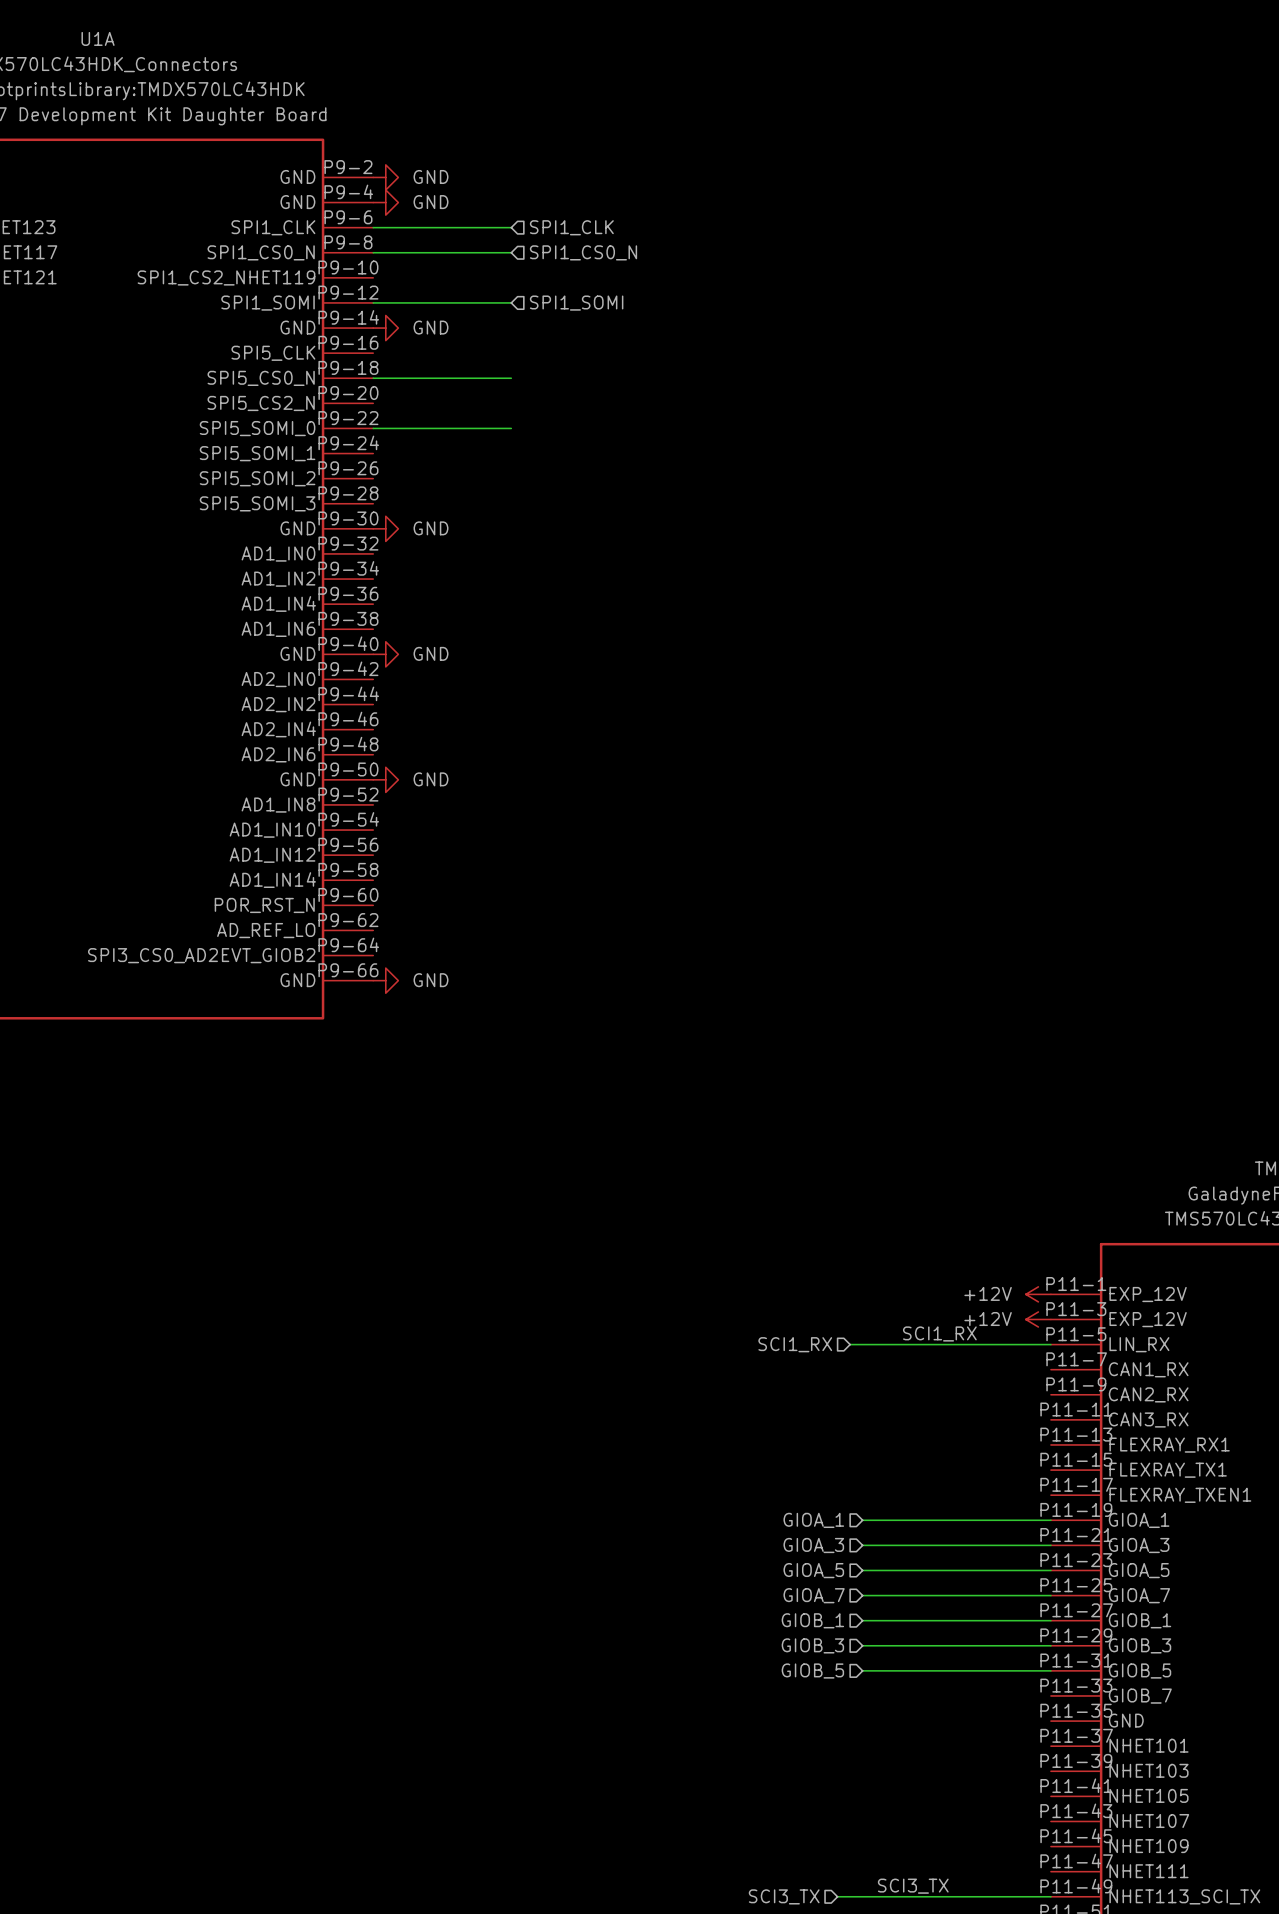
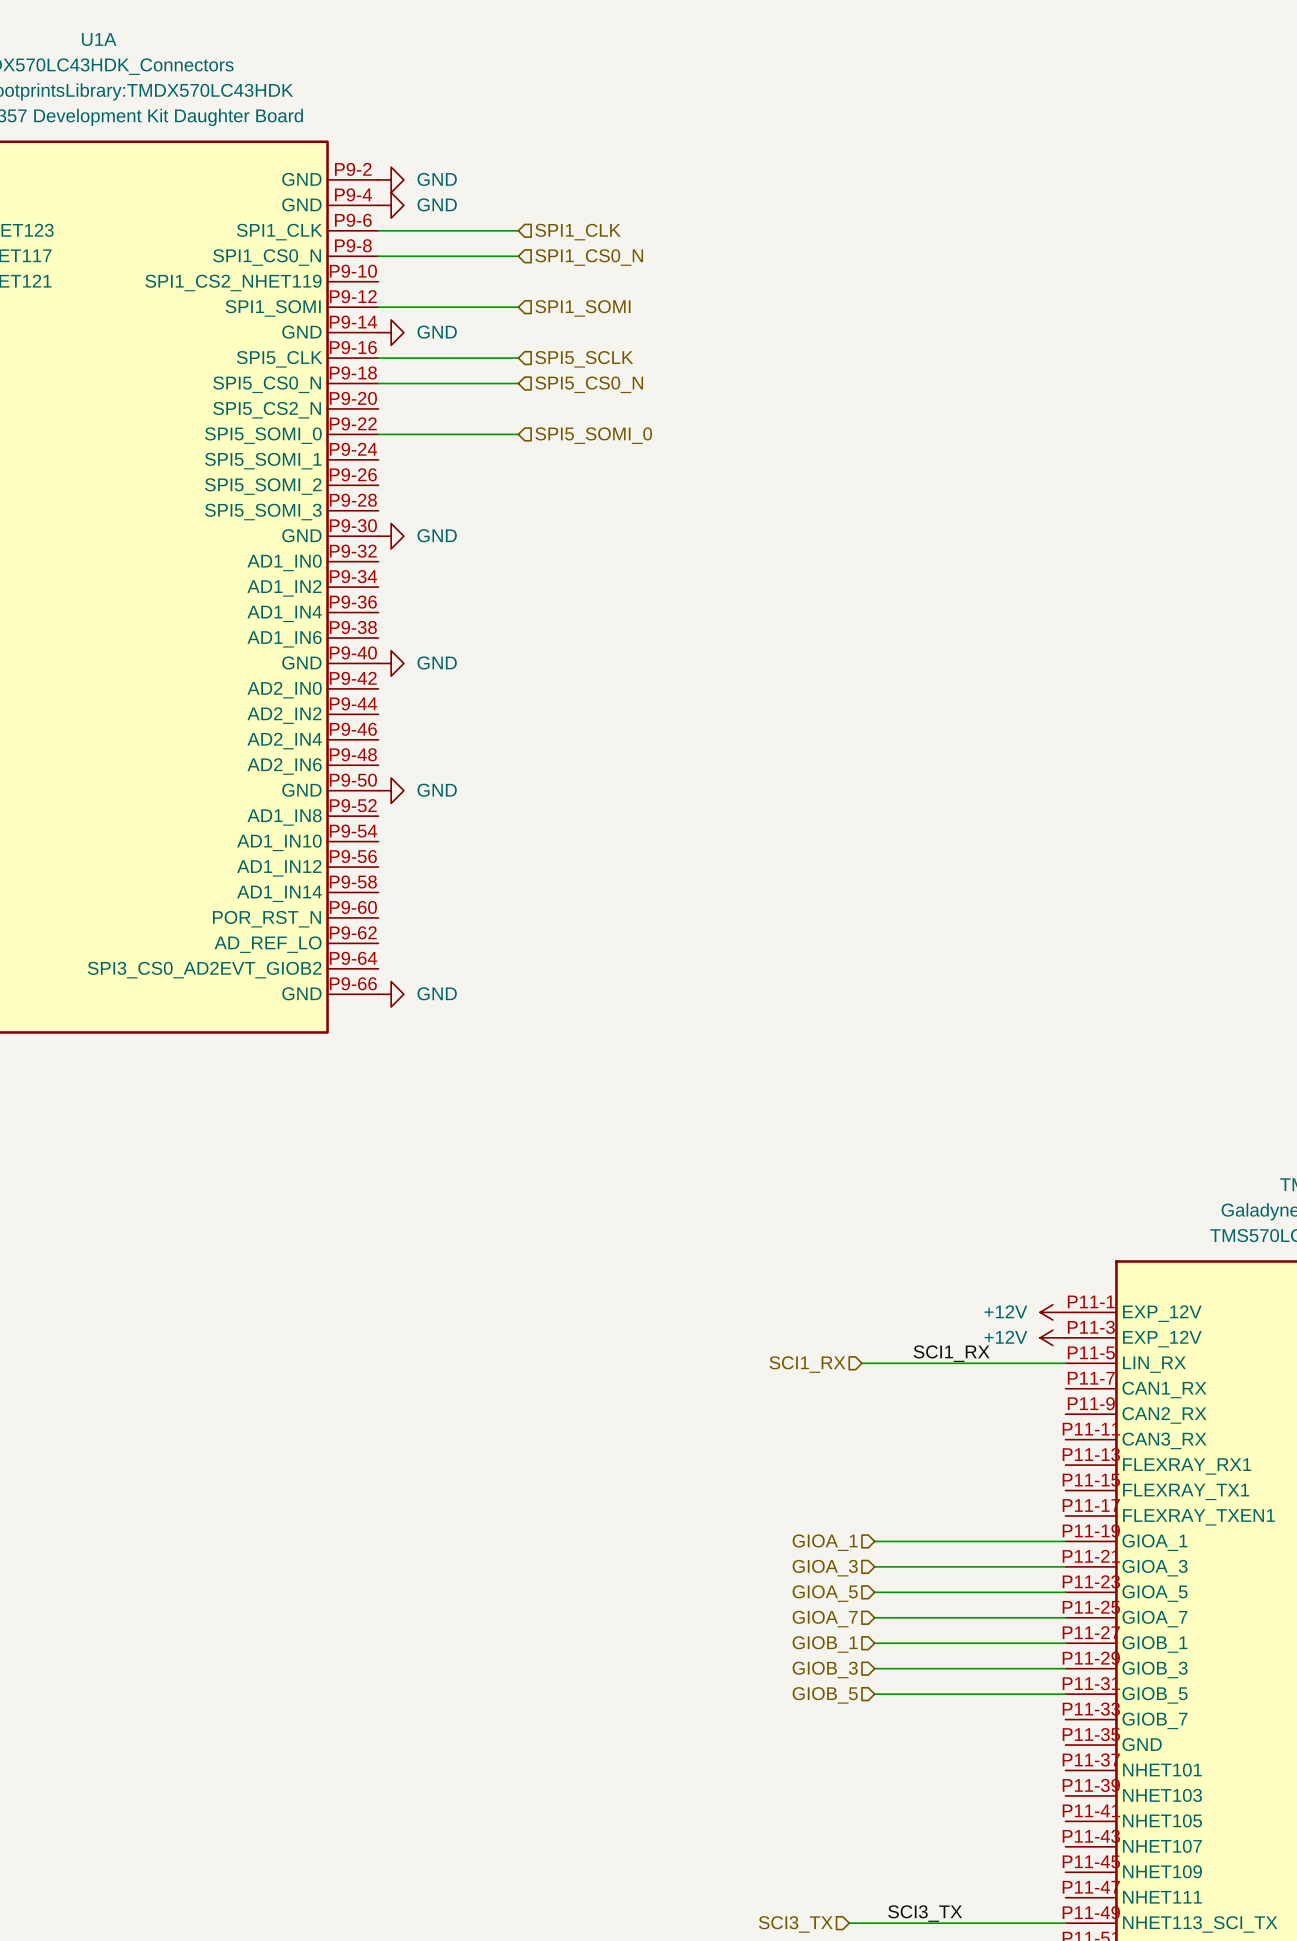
wire: none -> (378, 358) (518, 358)
hierarchical label: none -> SPI5_SCLK (584, 359)
hierarchical label: none -> SPI5_CS0_N (589, 384)
hierarchical label: none -> SPI5_SOMI_0 (593, 435)

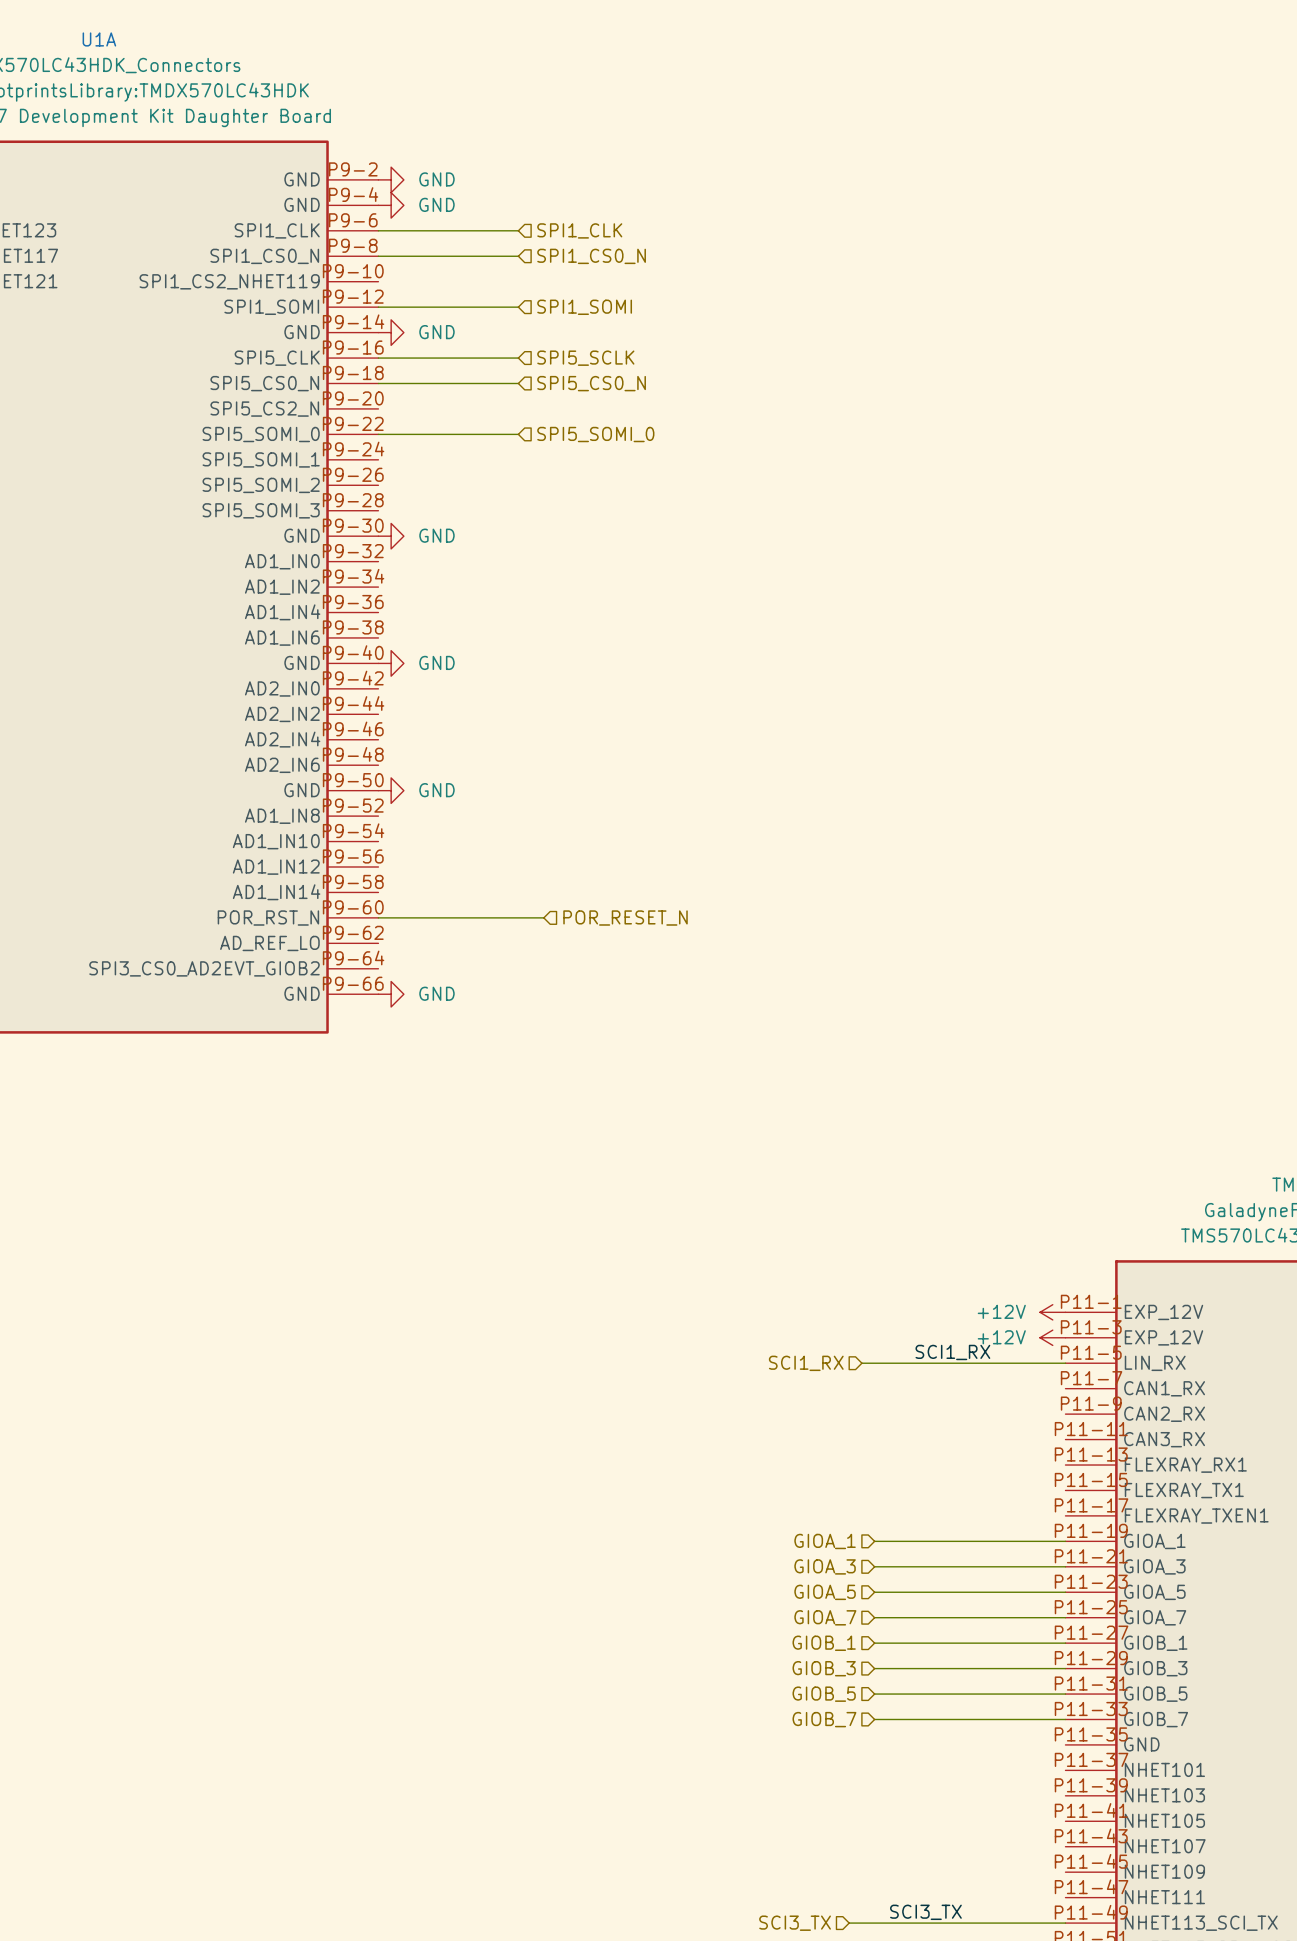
wire: none -> (378, 917) (543, 917)
hierarchical label: none -> POR_RESET_N (625, 918)
wire: none -> (874, 1719) (1065, 1719)
hierarchical label: none -> GIOB_7 (824, 1719)

